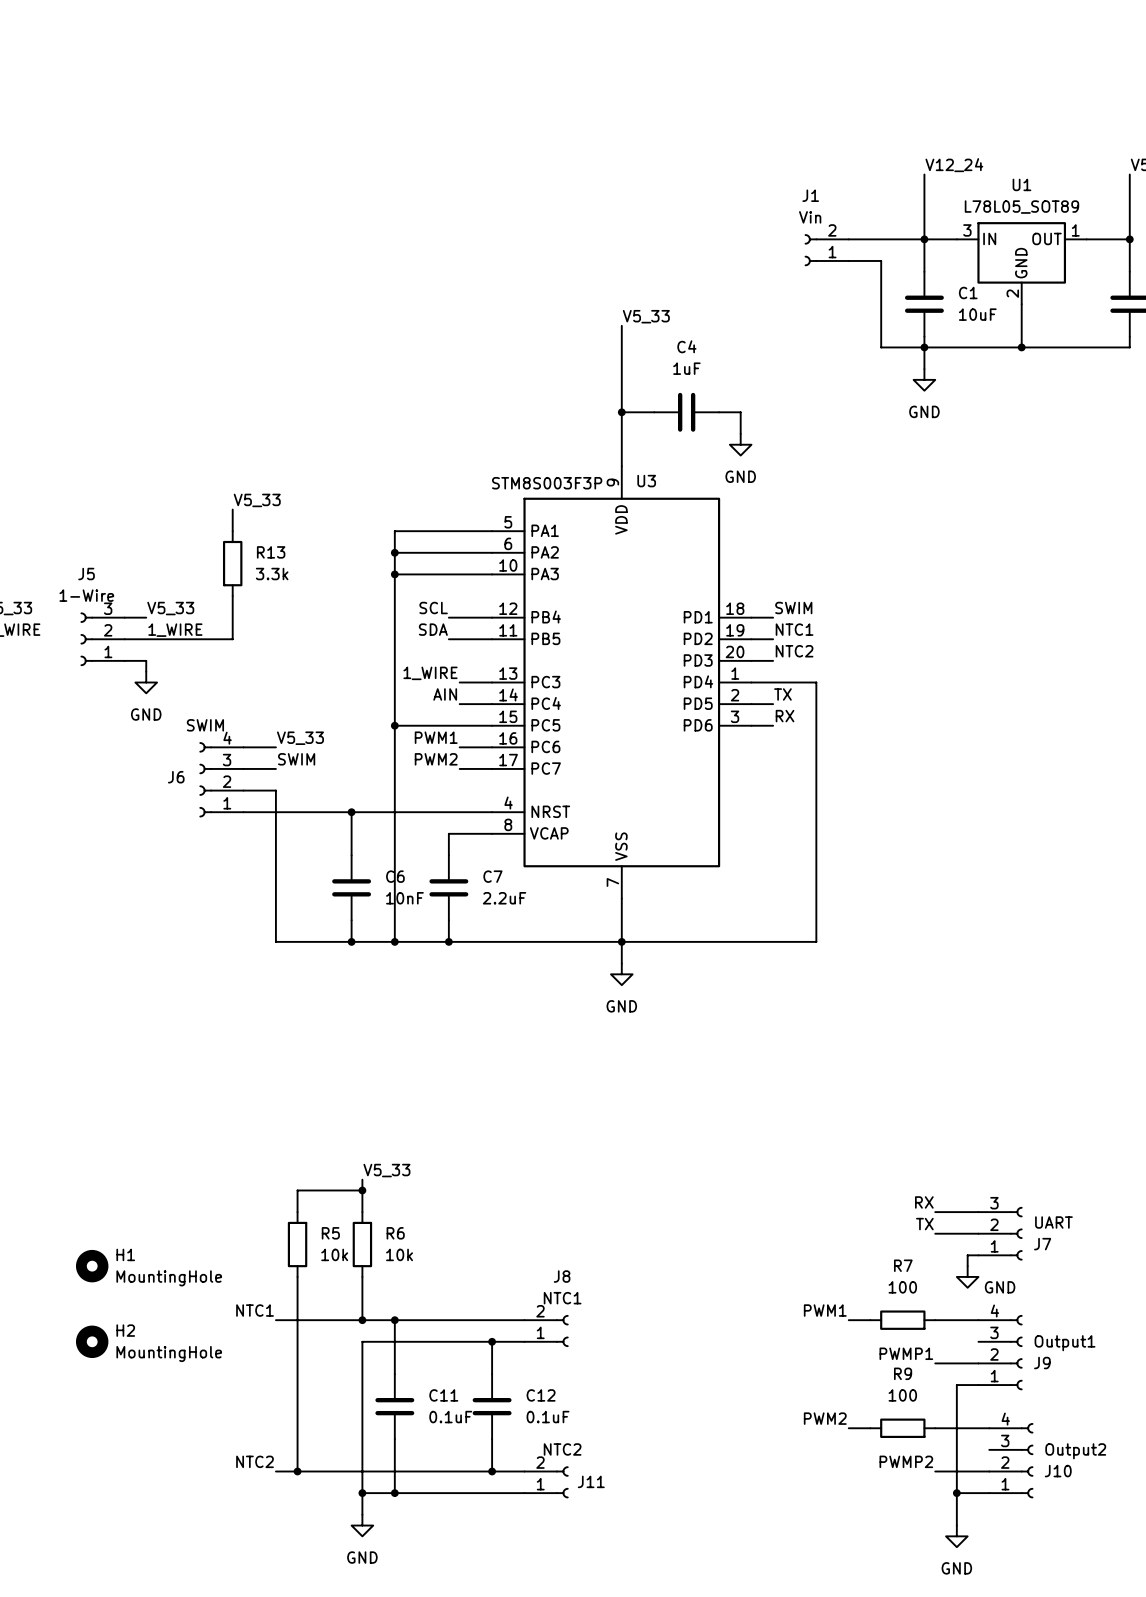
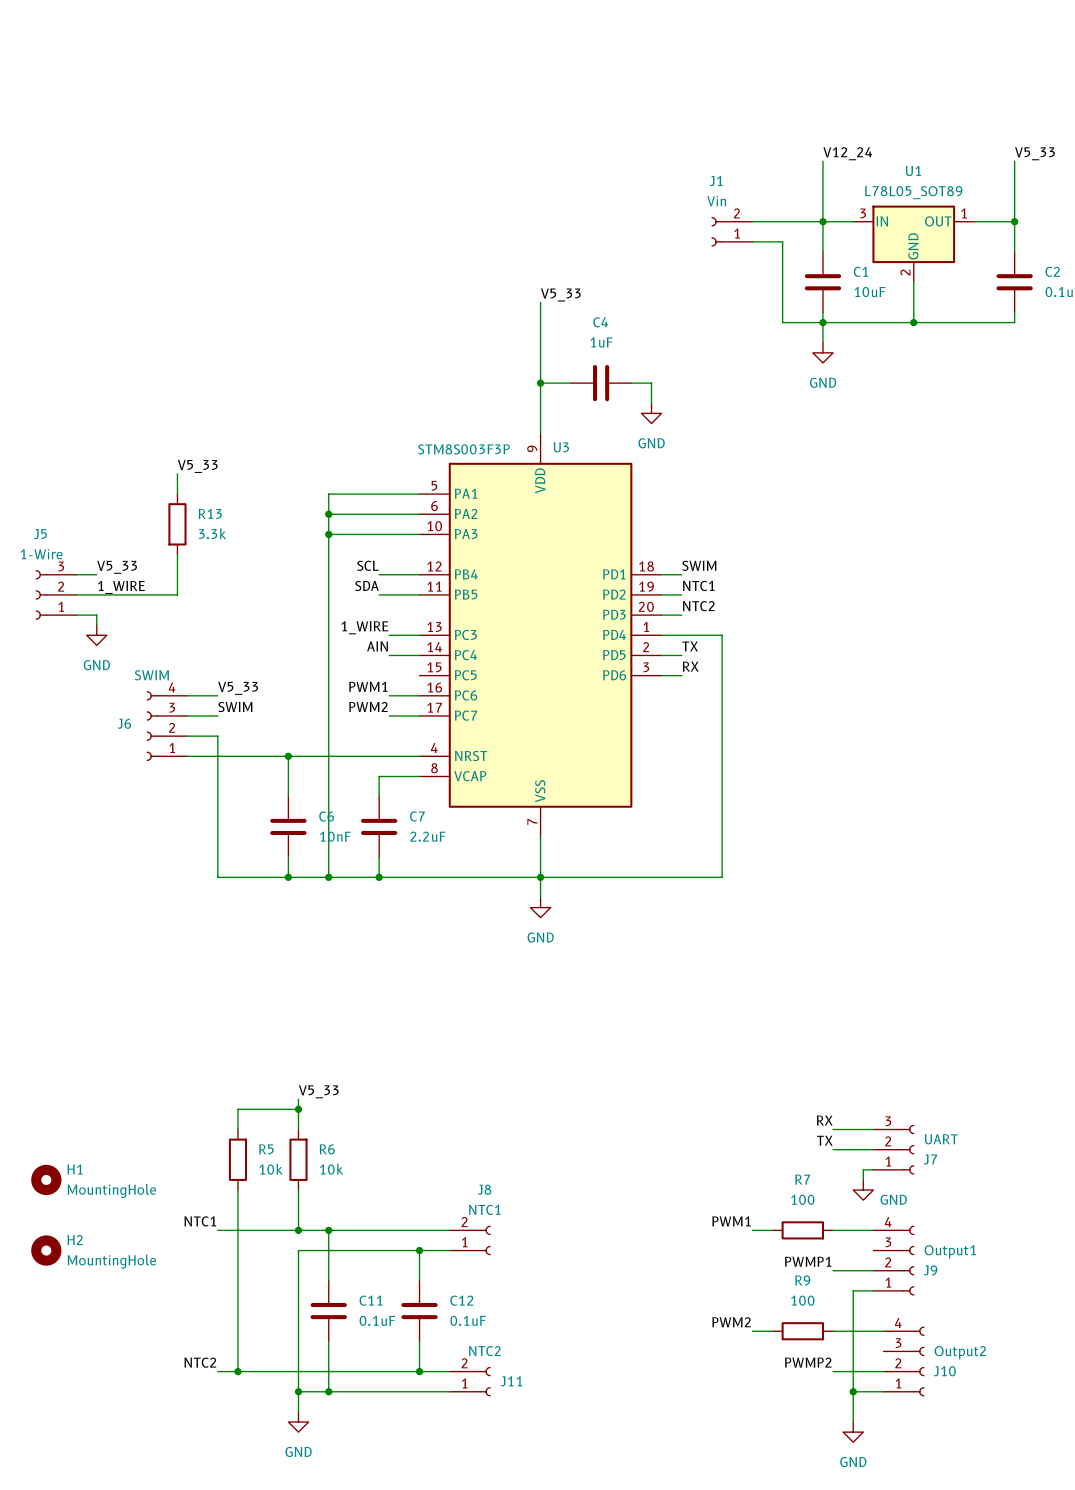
wire: (394, 725) (492, 725) -> none
junction: (394, 725) -> none

